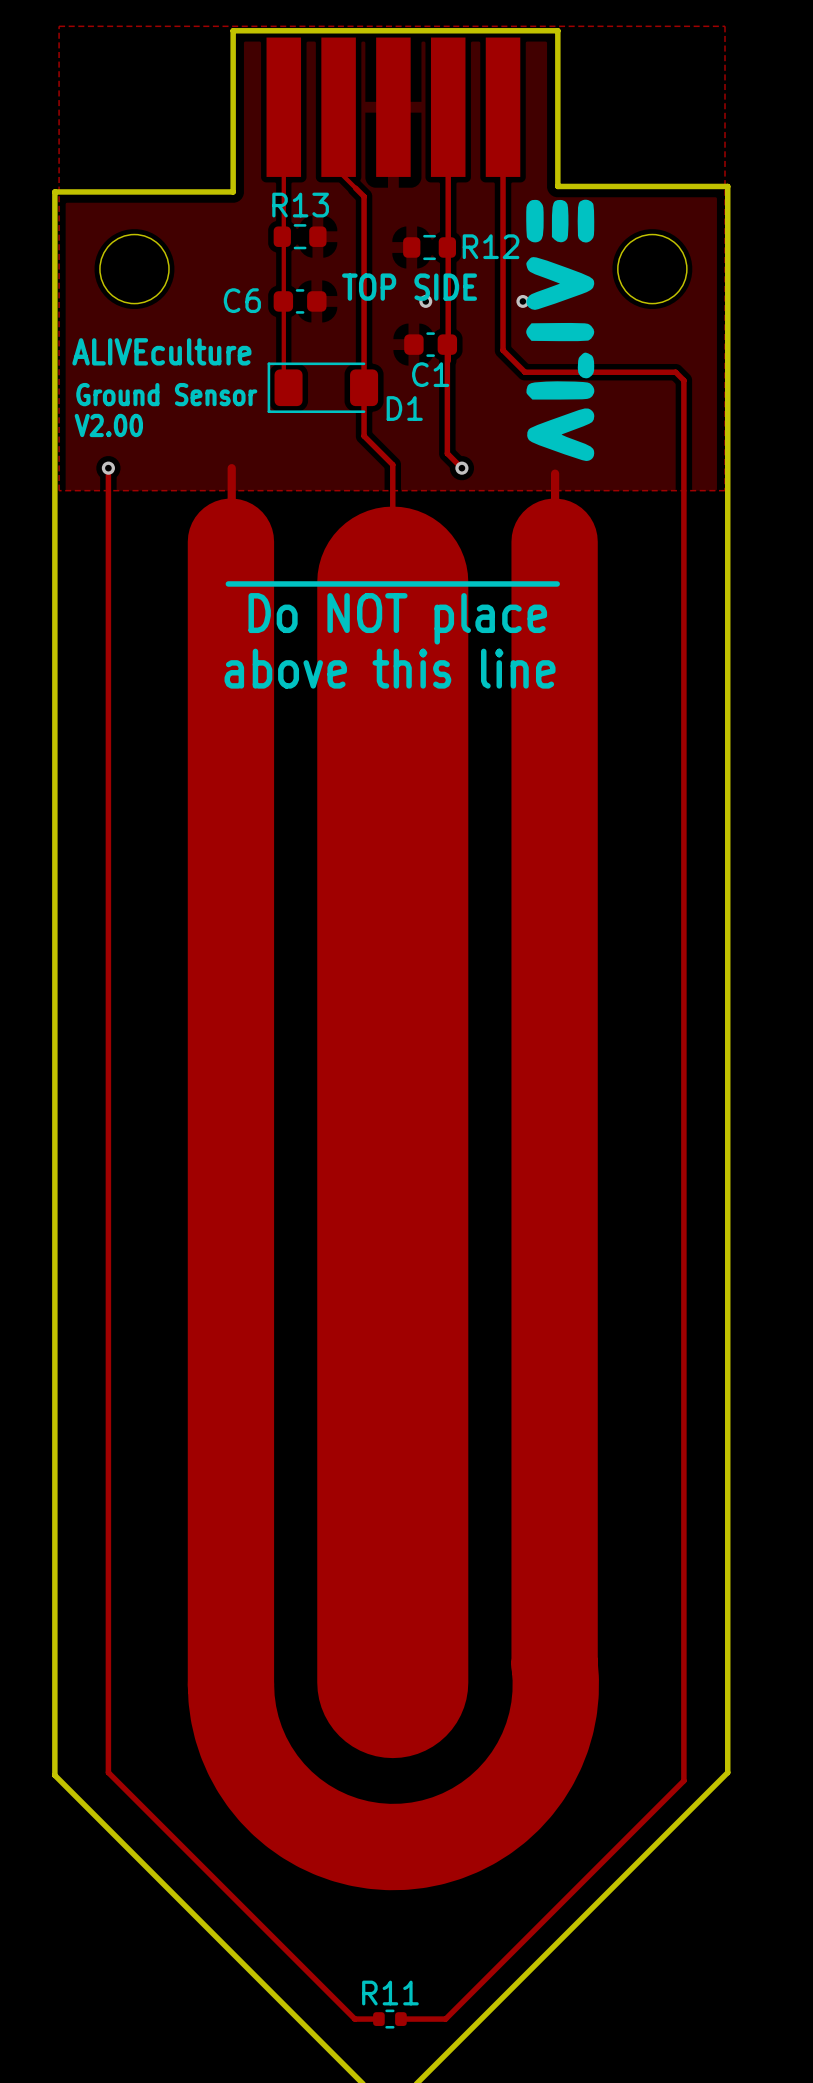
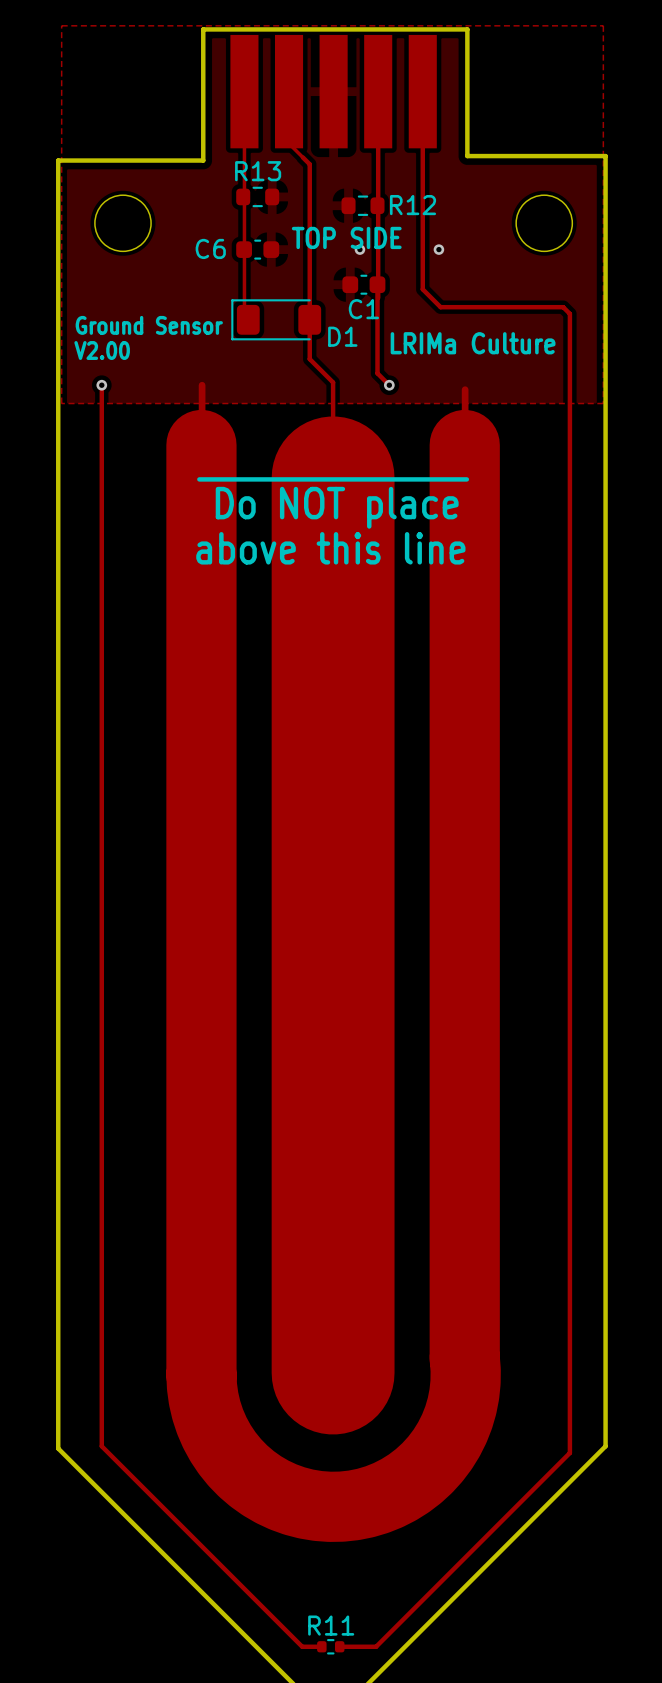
drawing: [526, 199, 595, 461] -> none
text: ALIVEculture (161, 351) -> none
text: none -> LRIMa Culture (473, 343)

